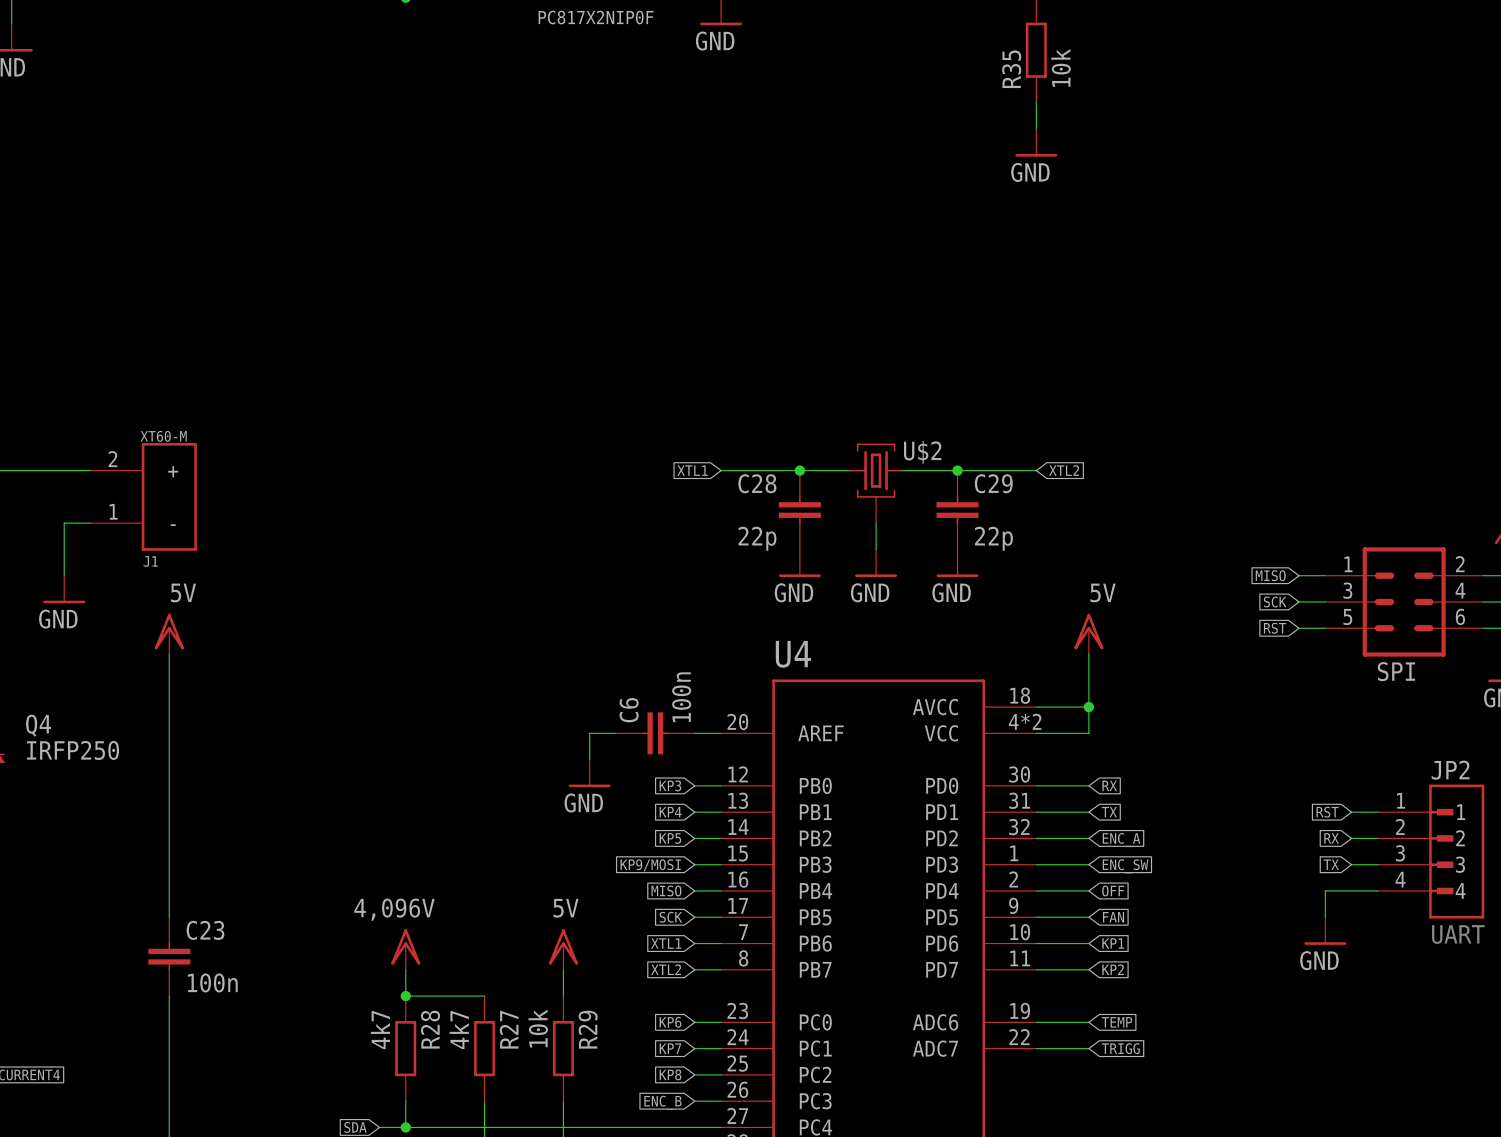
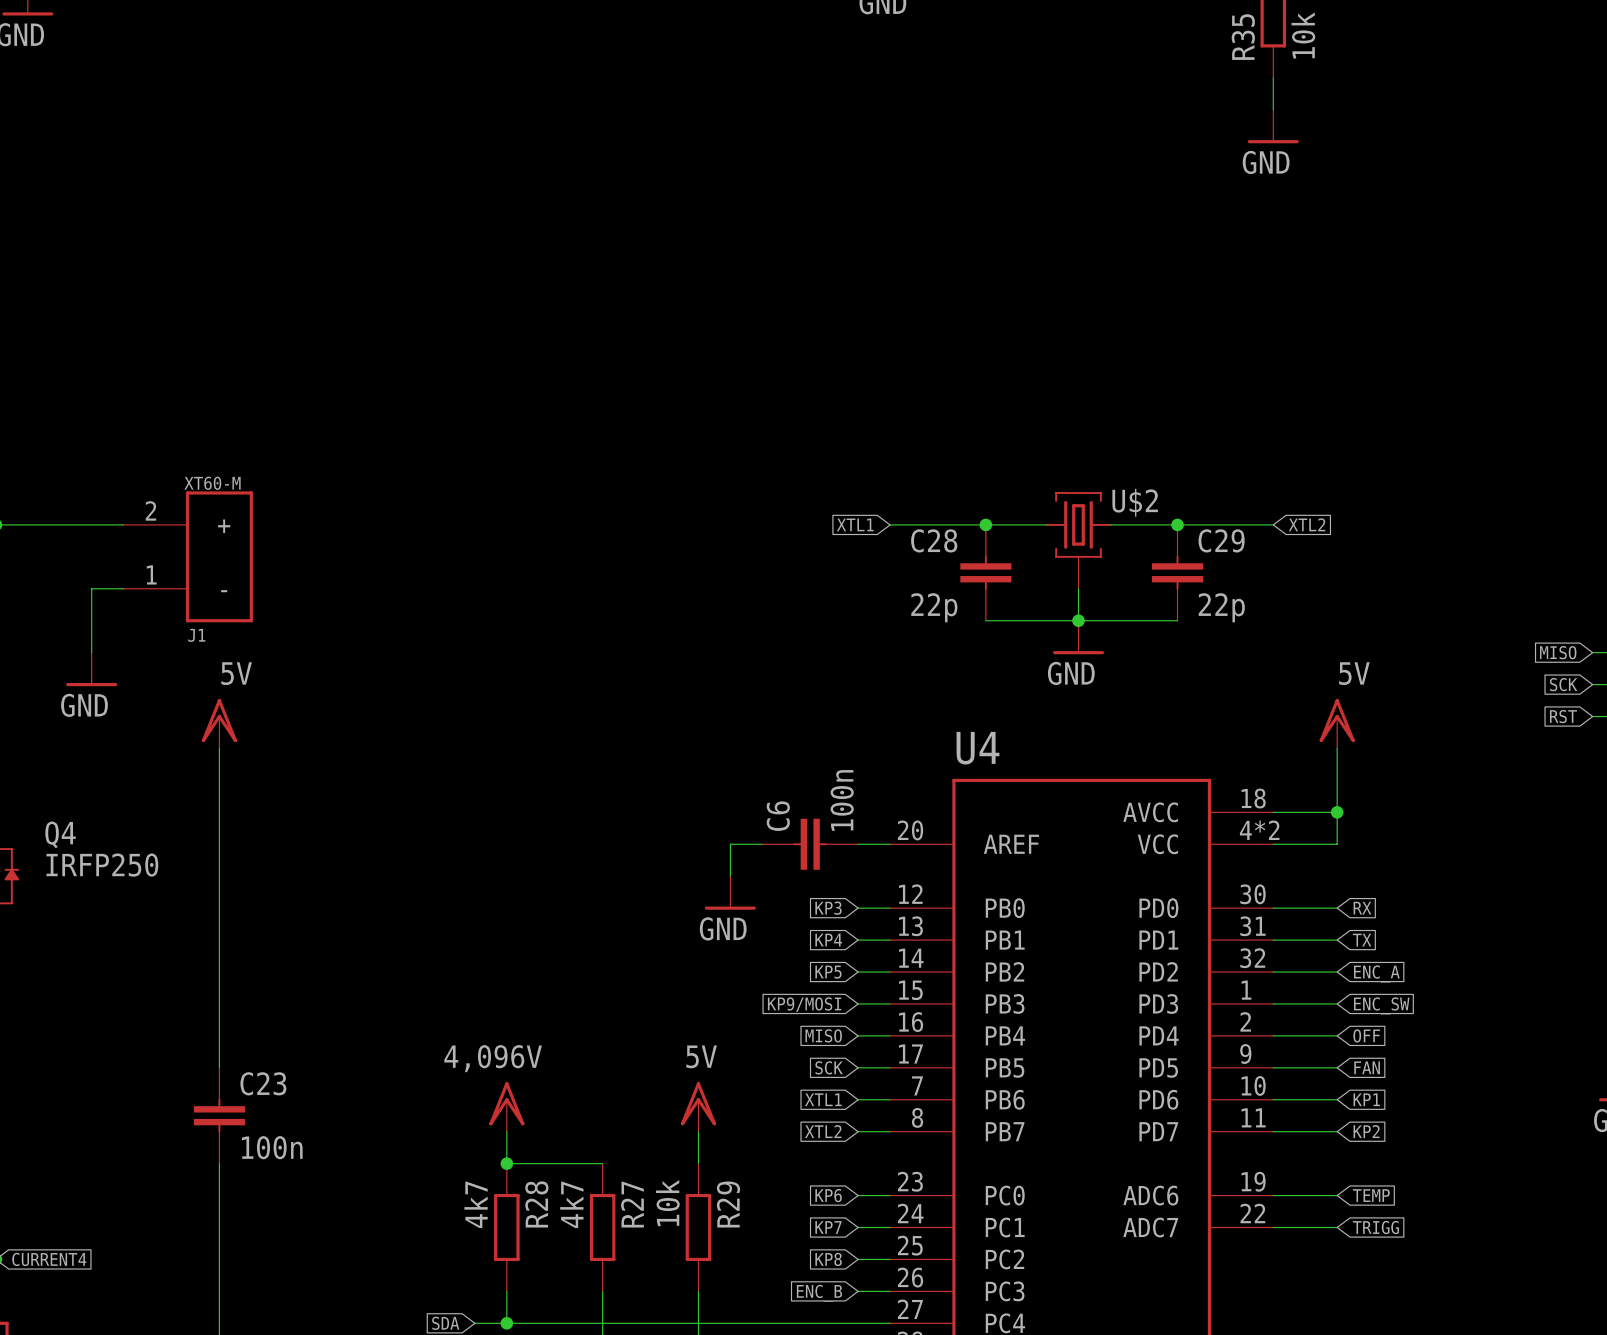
wire: none -> (985, 620) (1177, 620)
junction: none -> (1078, 620)
power symbol: GND (799, 563) -> none
power symbol: GND (957, 563) -> none

